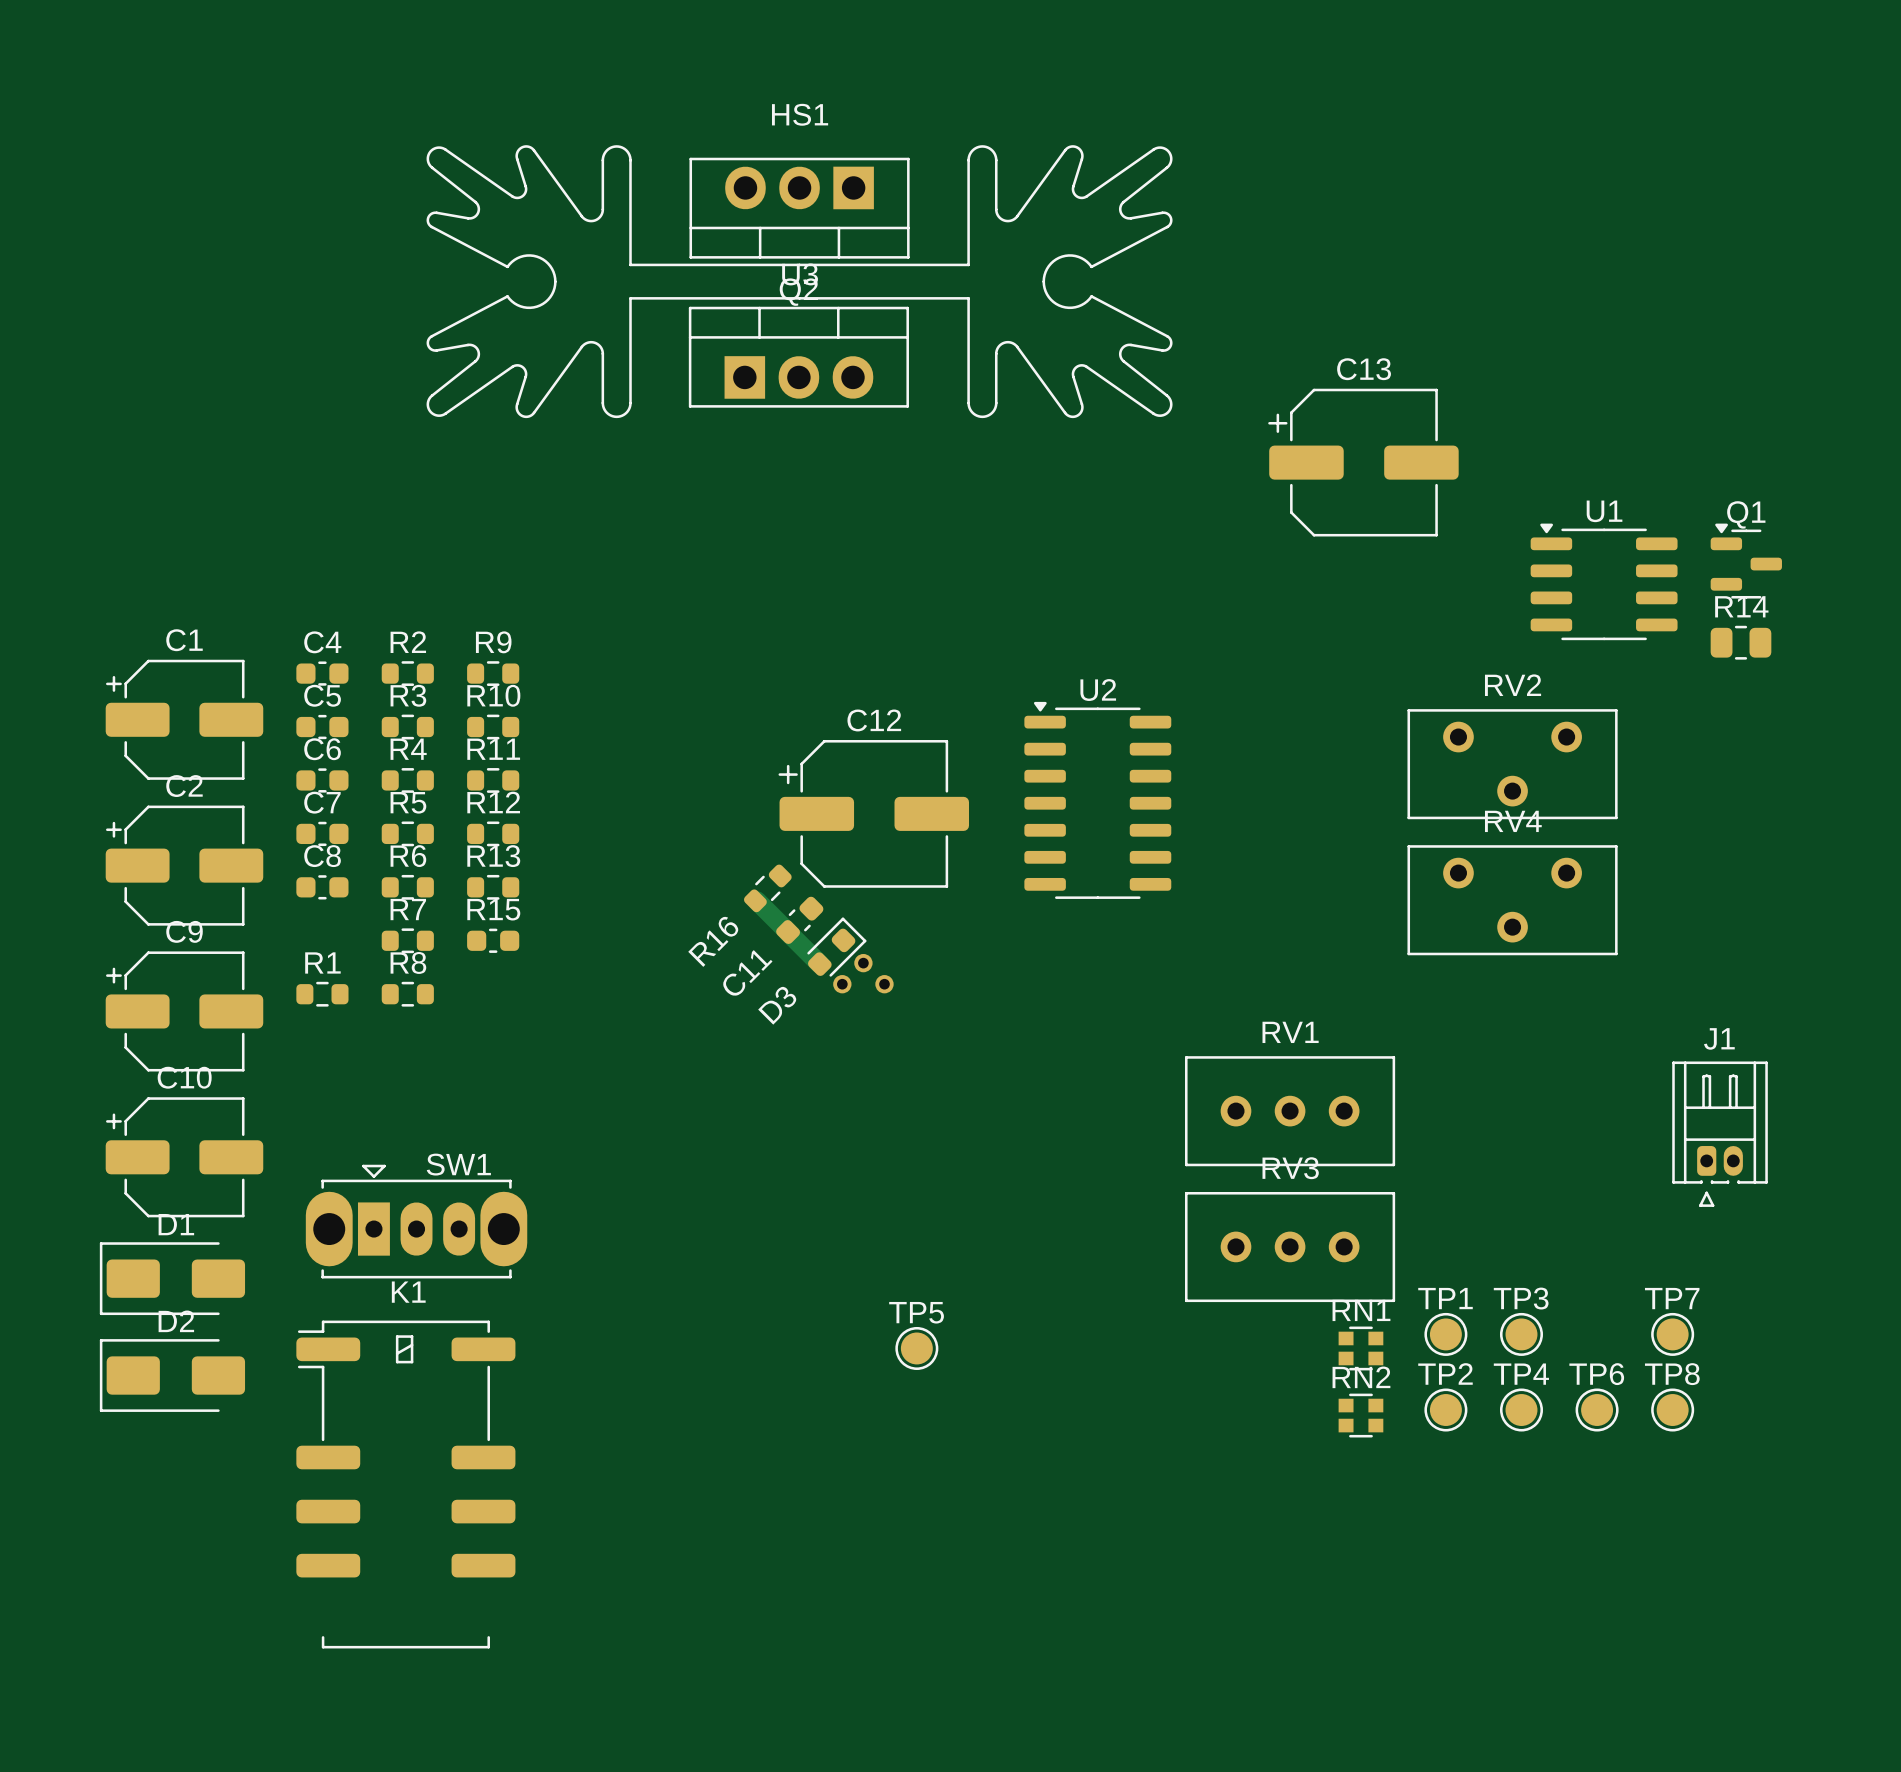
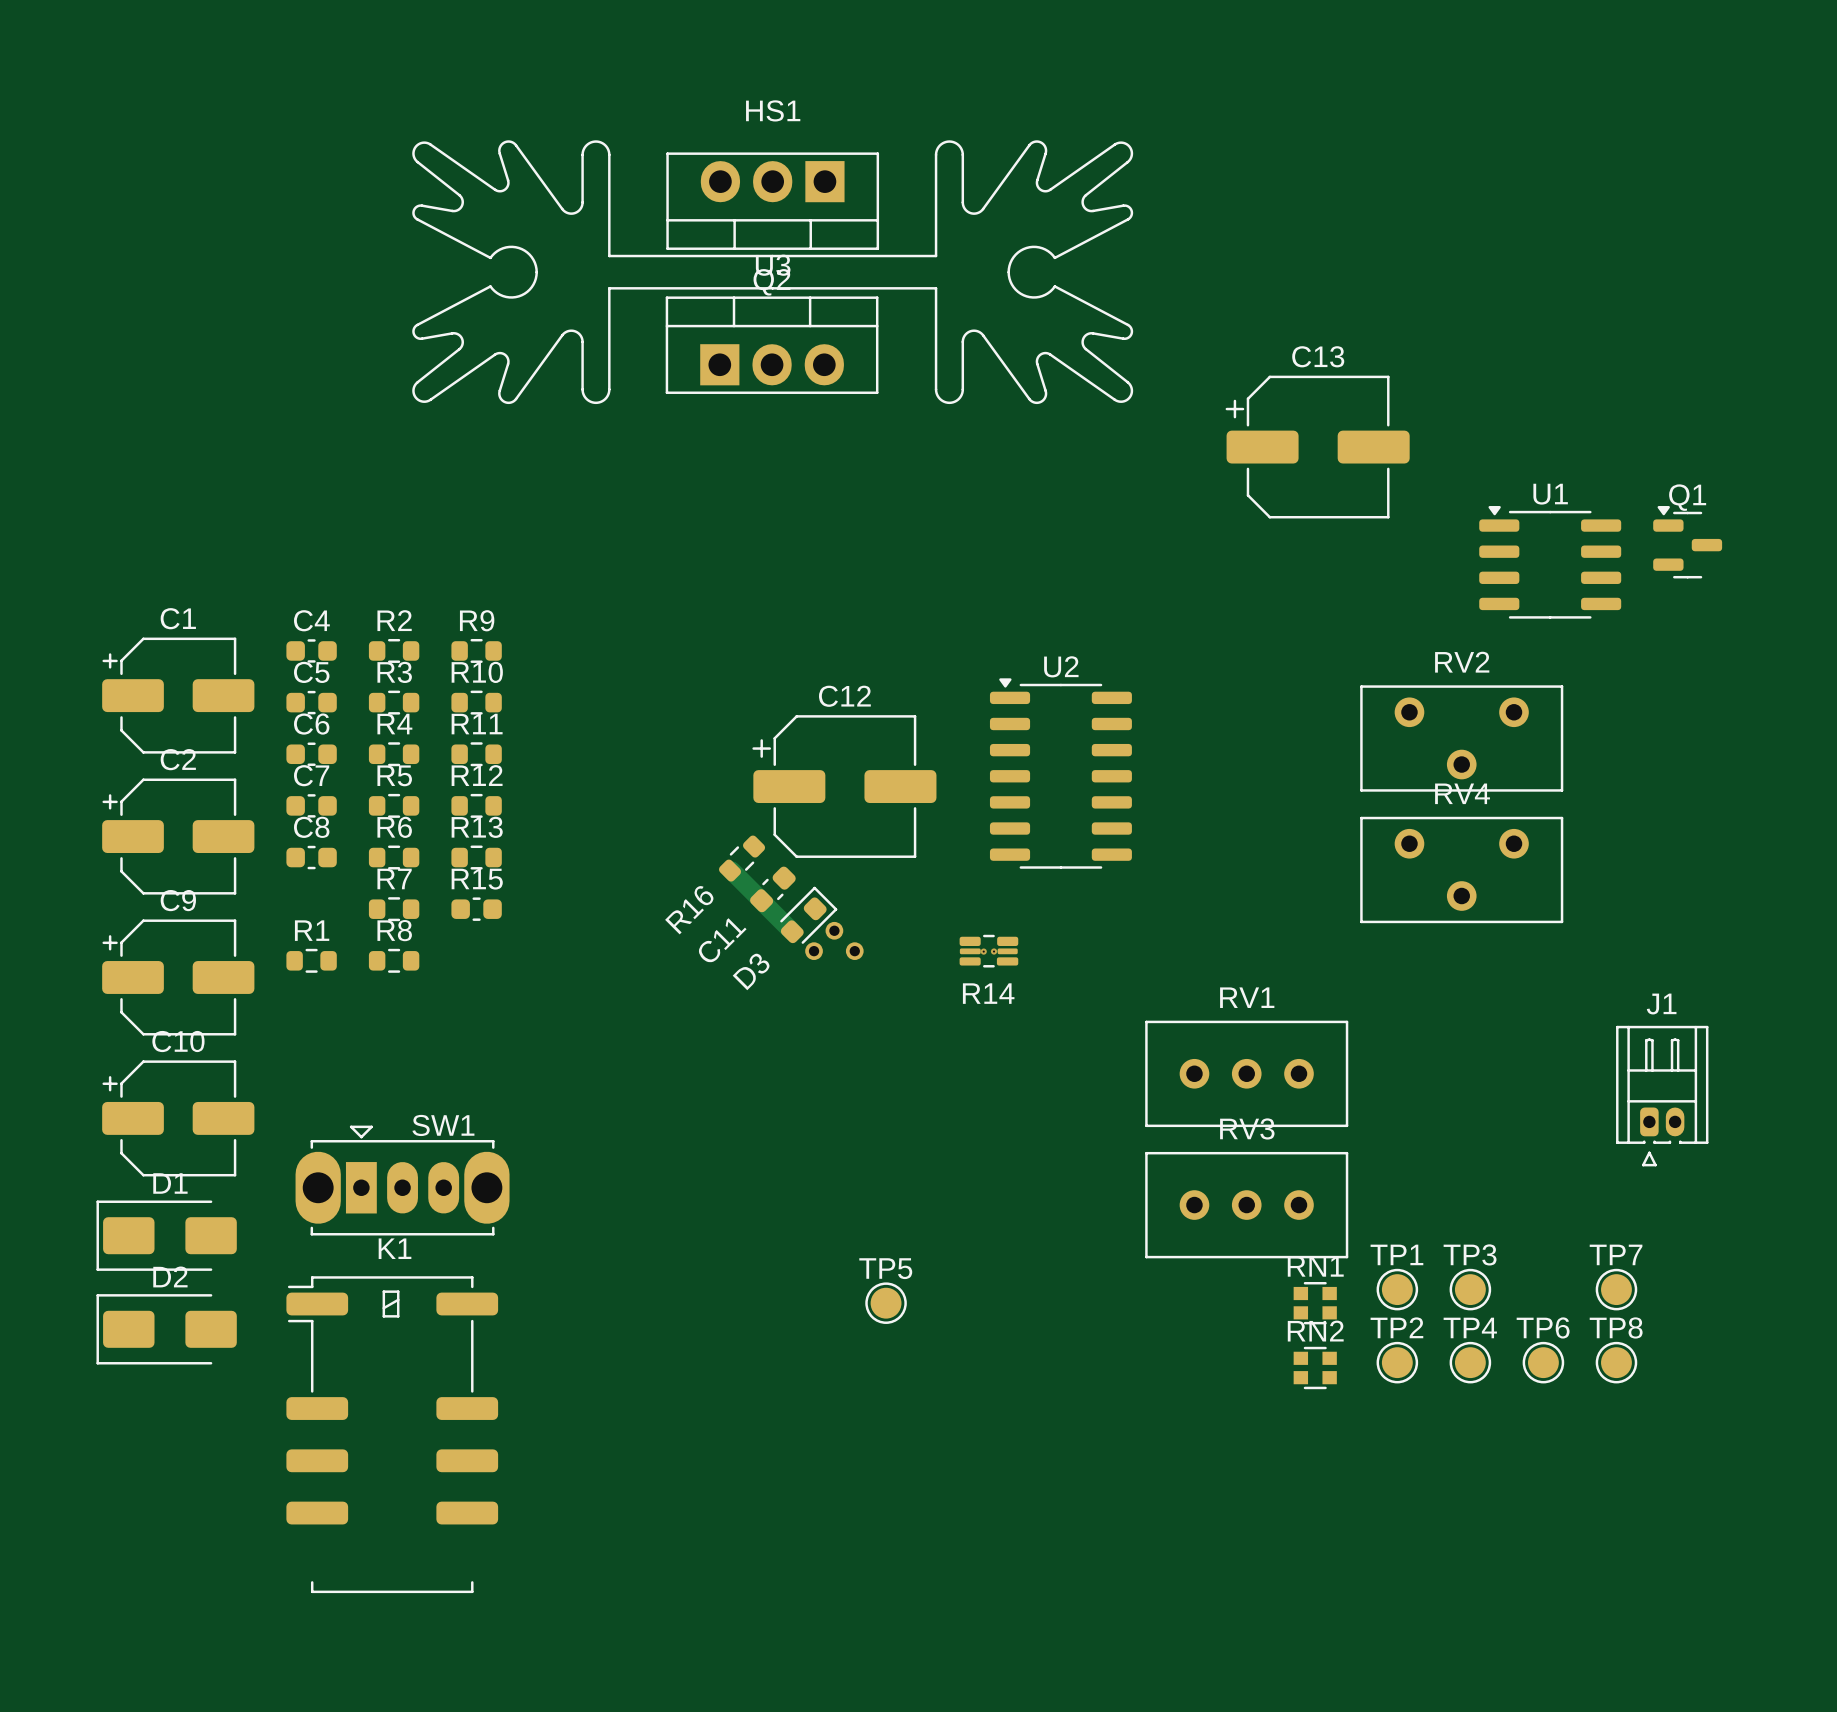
R14 name position: R14 (1741, 606) -> R14 (988, 993)
R14 footprint: [1710, 625, 1772, 660] -> [959, 934, 1019, 968]
via: none -> (983, 951)
via: none -> (994, 951)

